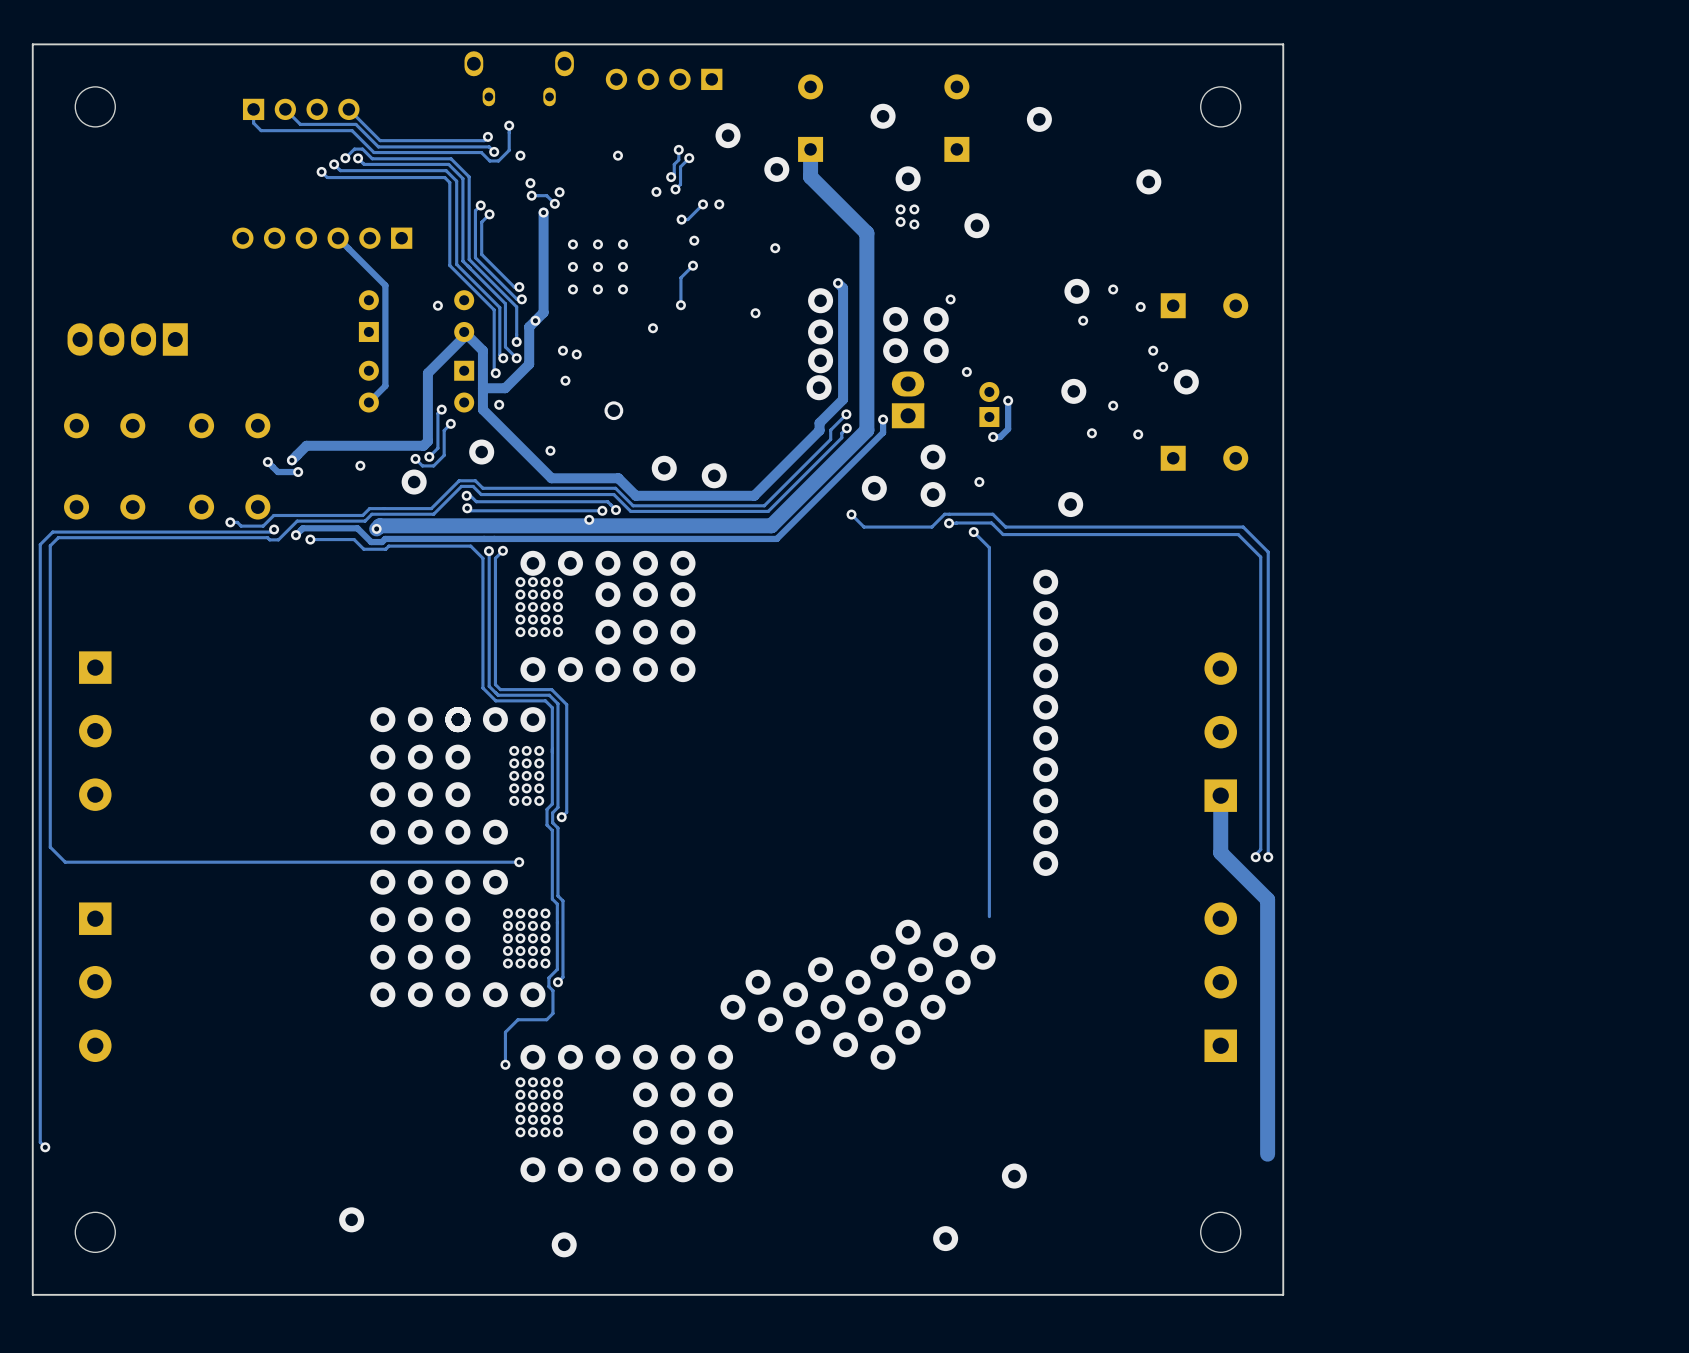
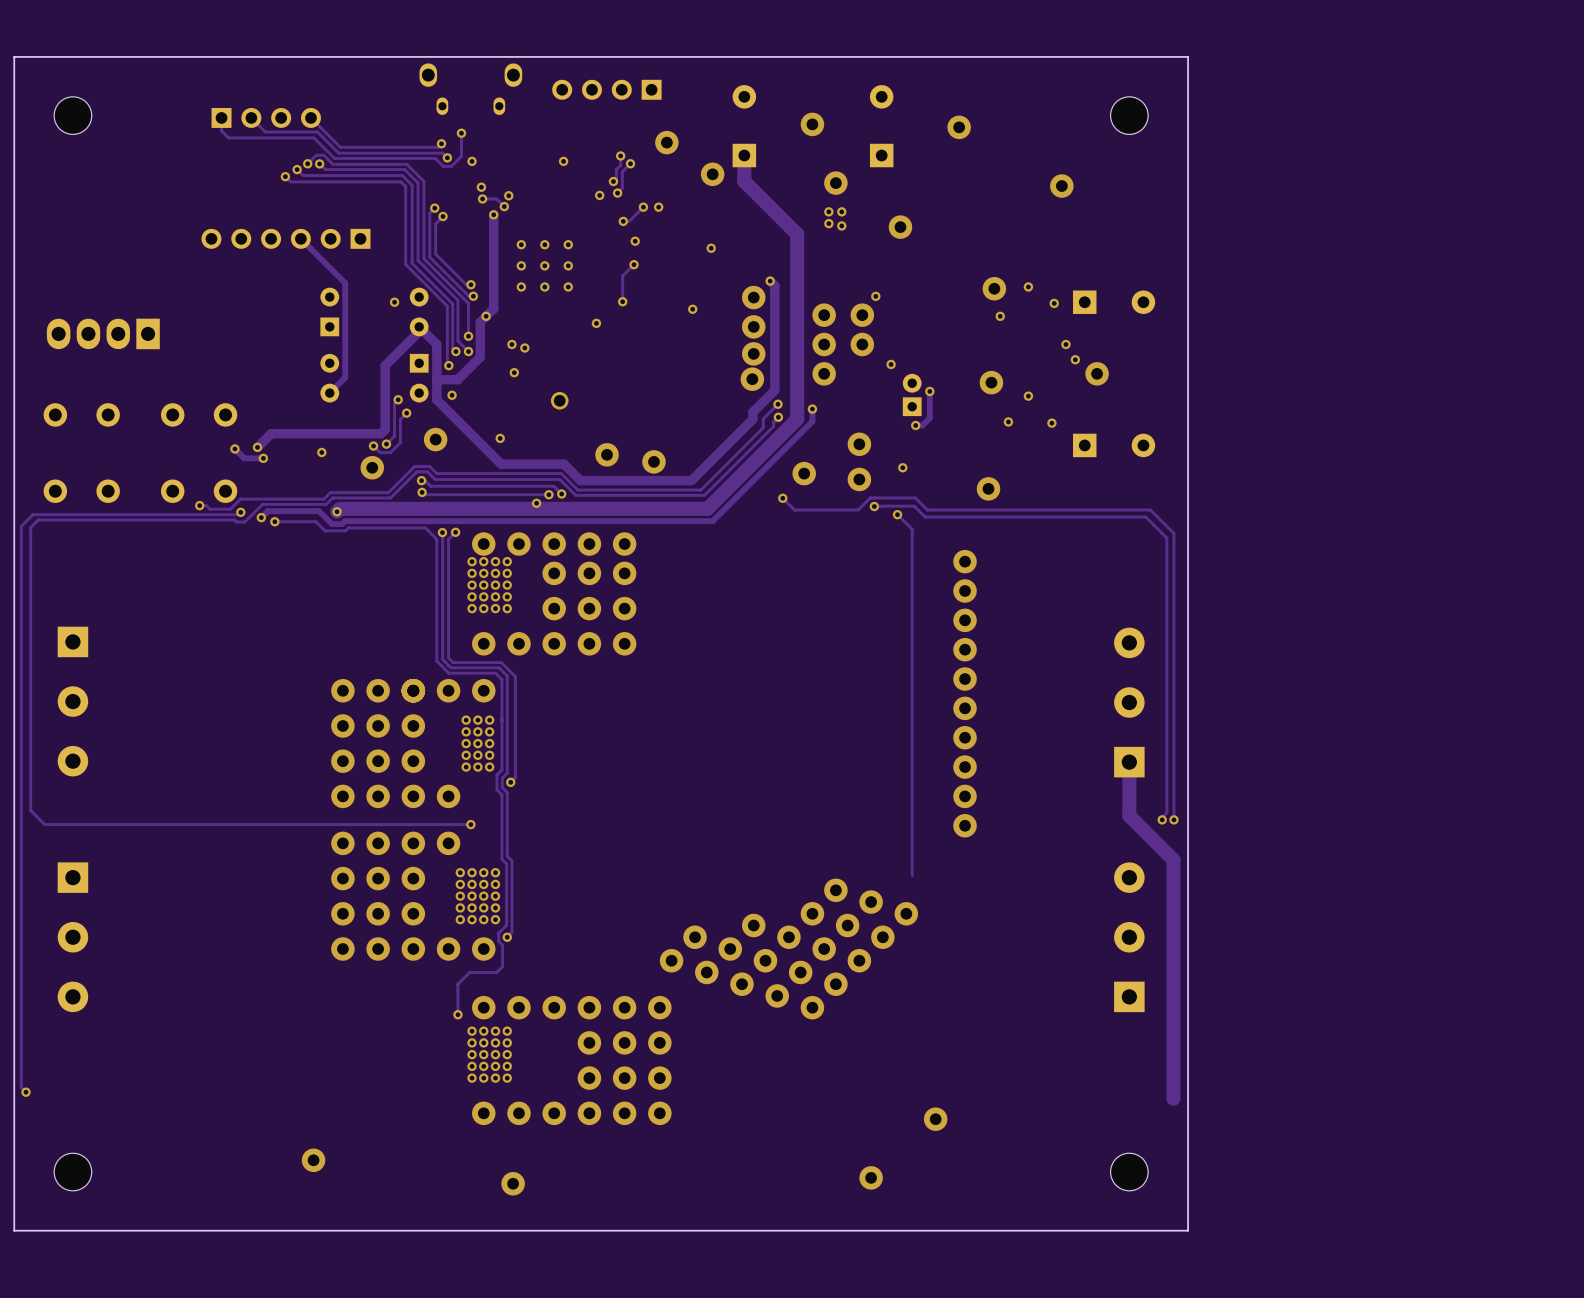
via: none -> (824, 373)
part: (908, 399) -> none

